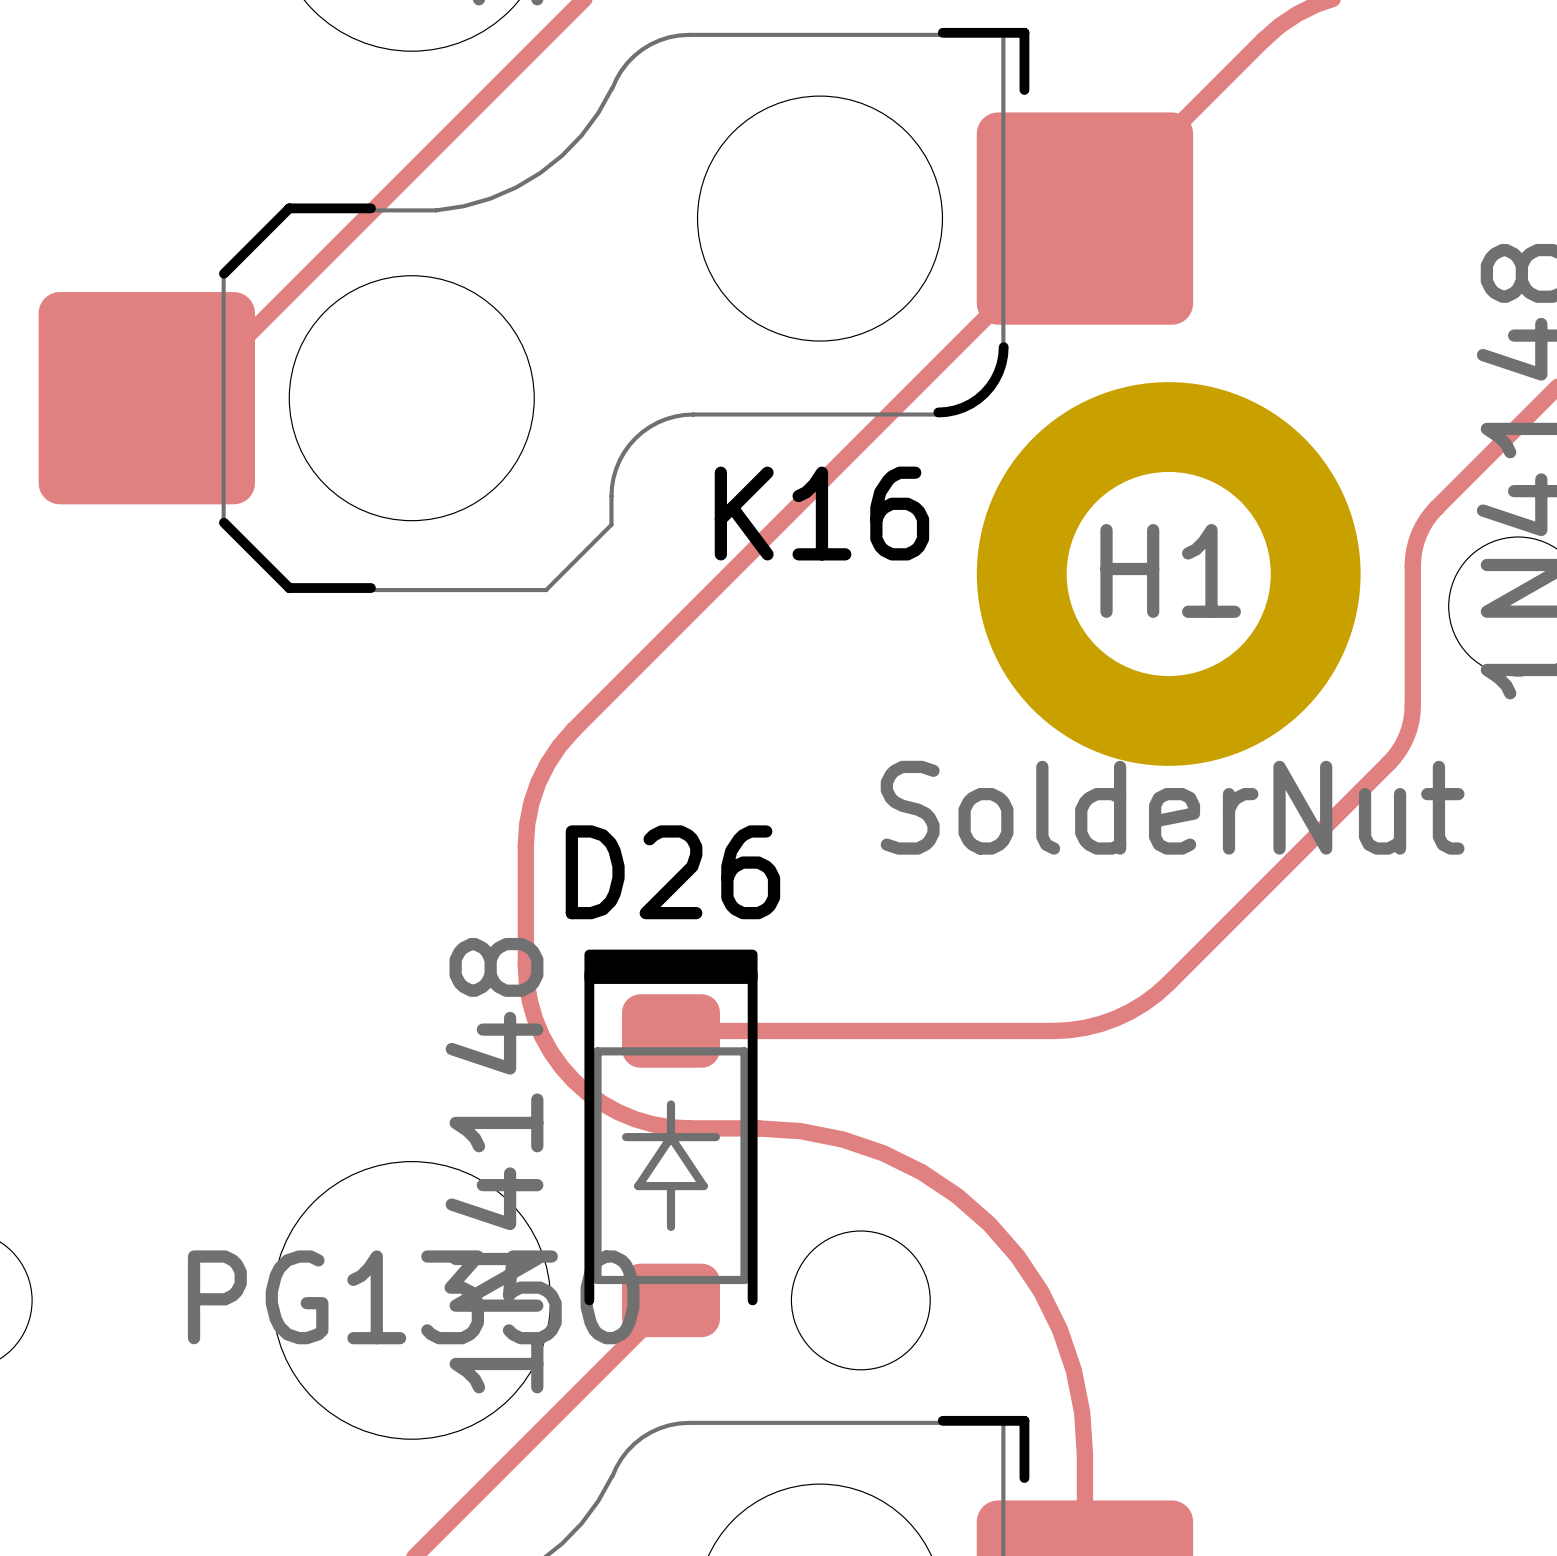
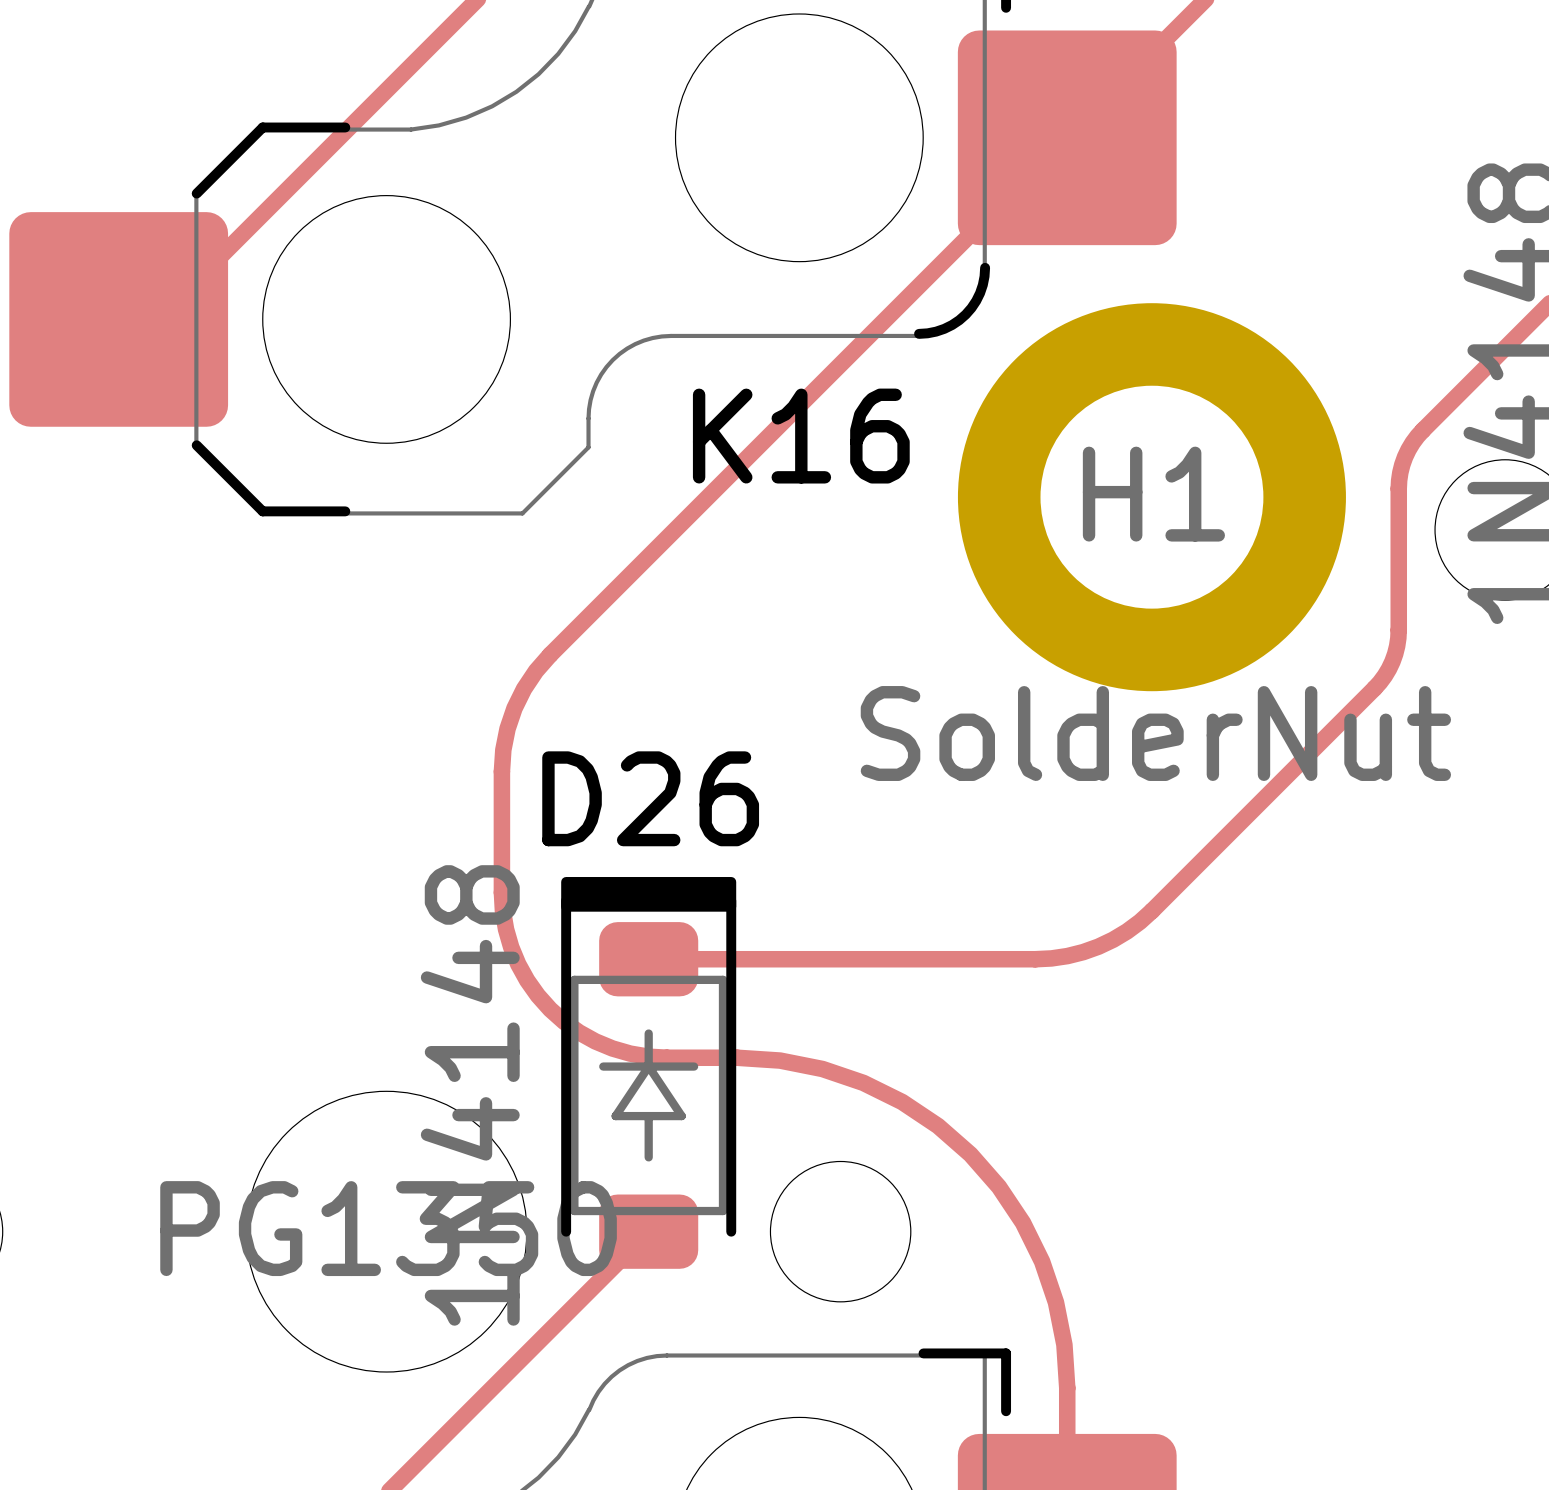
H1 footprint: [976, 382, 1361, 766] -> [957, 303, 1346, 692]

